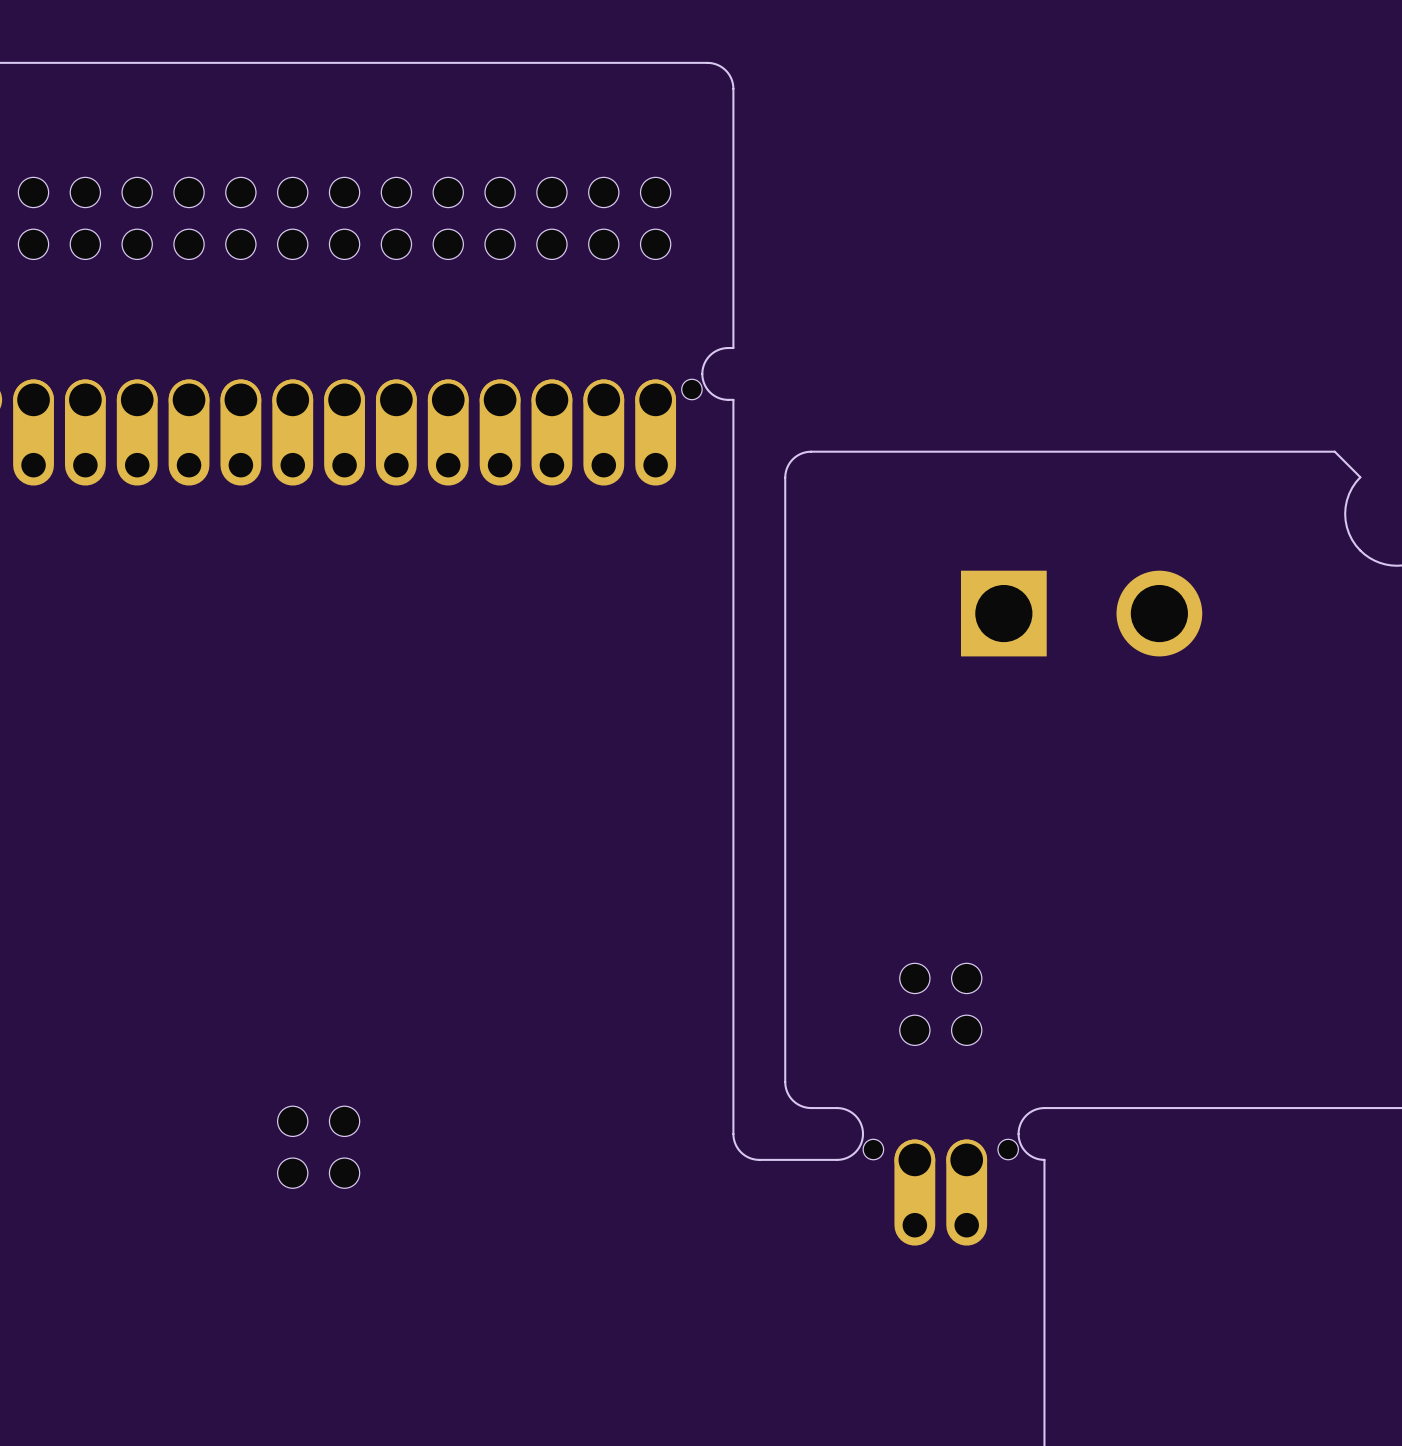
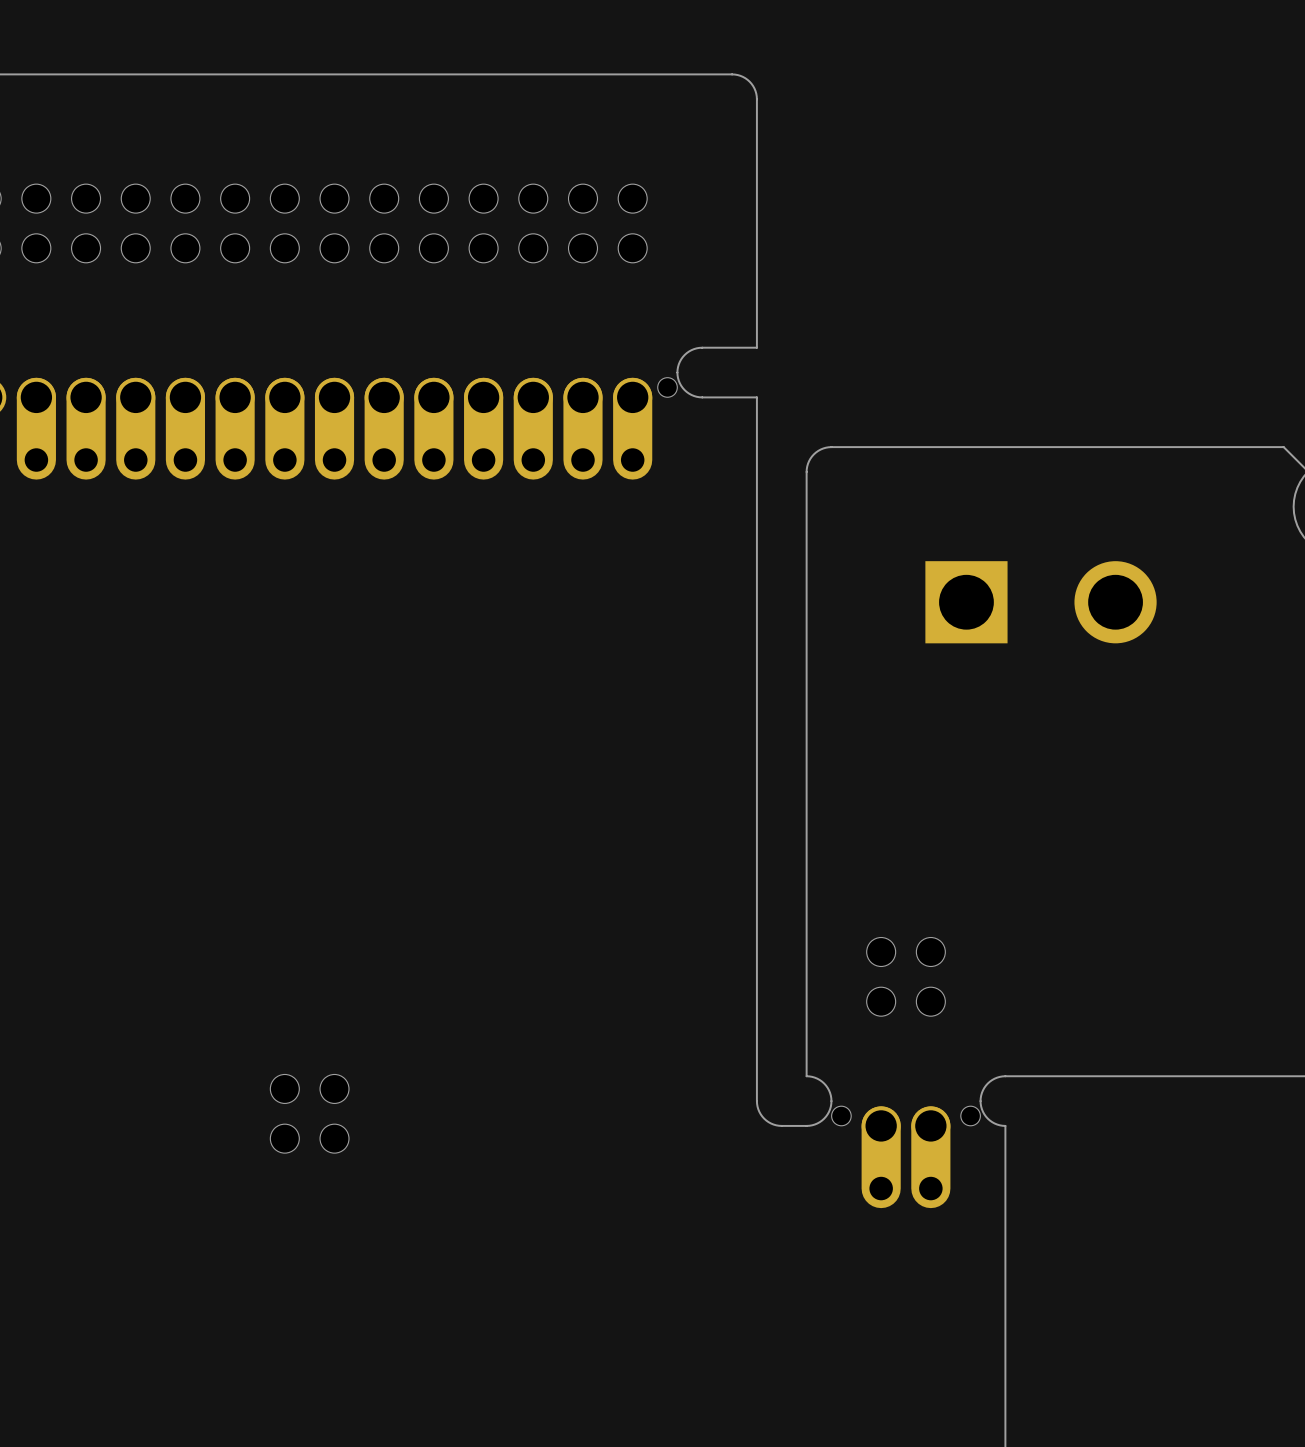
board edge: (707, 62) (718, 65) (725, 70) (733, 85) (733, 348) -> (682, 74) (740, 75) (751, 83) (756, 96) (756, 347) (707, 347)
board edge: (733, 399) (733, 1136) (739, 1150) (750, 1158) (811, 1159) -> none
board edge: (863, 451) (802, 453) (790, 461) (785, 477) -> (707, 397) (756, 397) (756, 471)
board edge: none -> (831, 447) (820, 449) (813, 454) (808, 463) (806, 471) (806, 1076)
board edge: (785, 1082) (789, 1095) (799, 1105) (808, 1107) (837, 1108) -> (756, 1051) (758, 1109) (768, 1122) (781, 1125)

